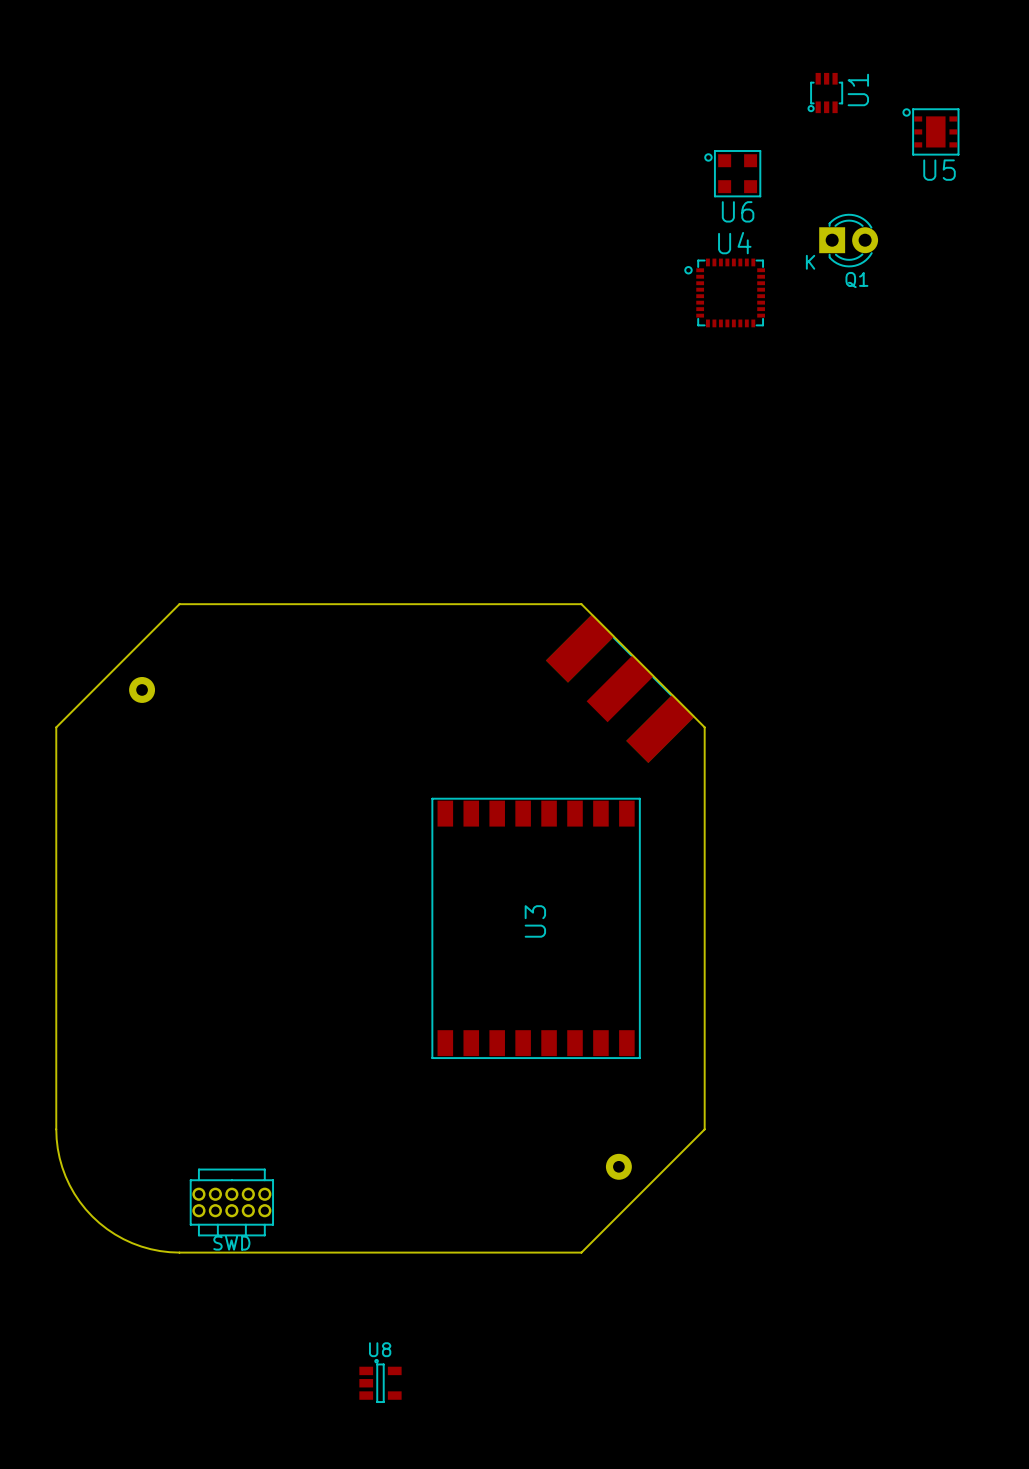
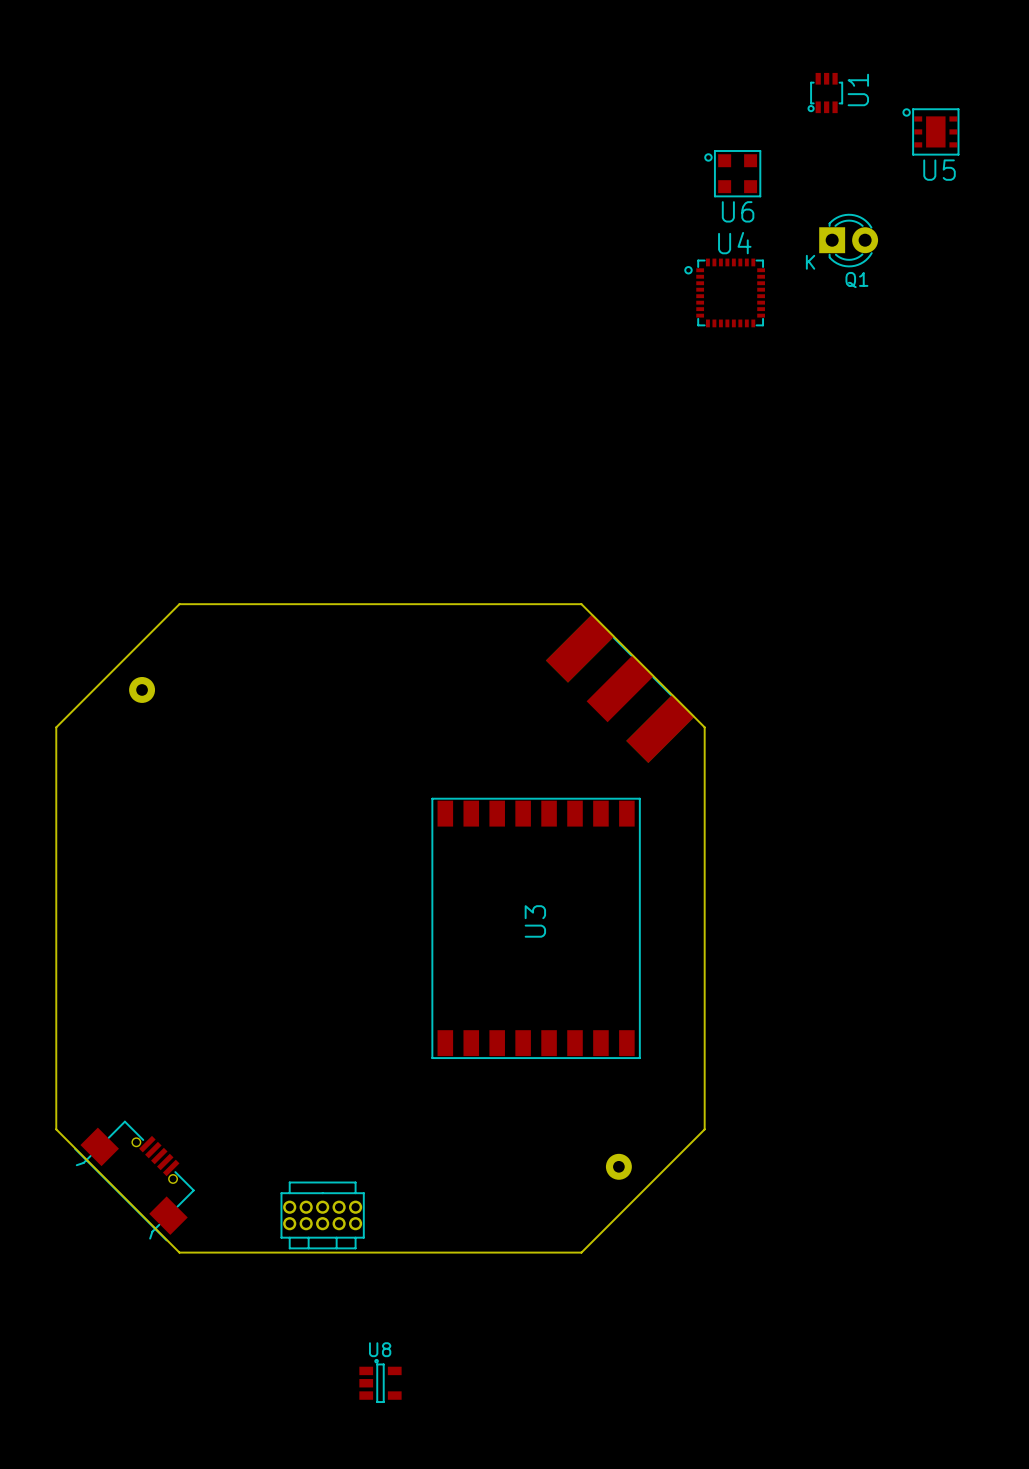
board edge: (56, 1129) (57, 1148) (65, 1176) (74, 1193) (92, 1216) (115, 1234) (132, 1243) (150, 1249) (179, 1252) -> (56, 1129) (179, 1252)
part: none -> (134, 1181)
part: SWD (231, 1202) -> none
part: none -> (322, 1215)

